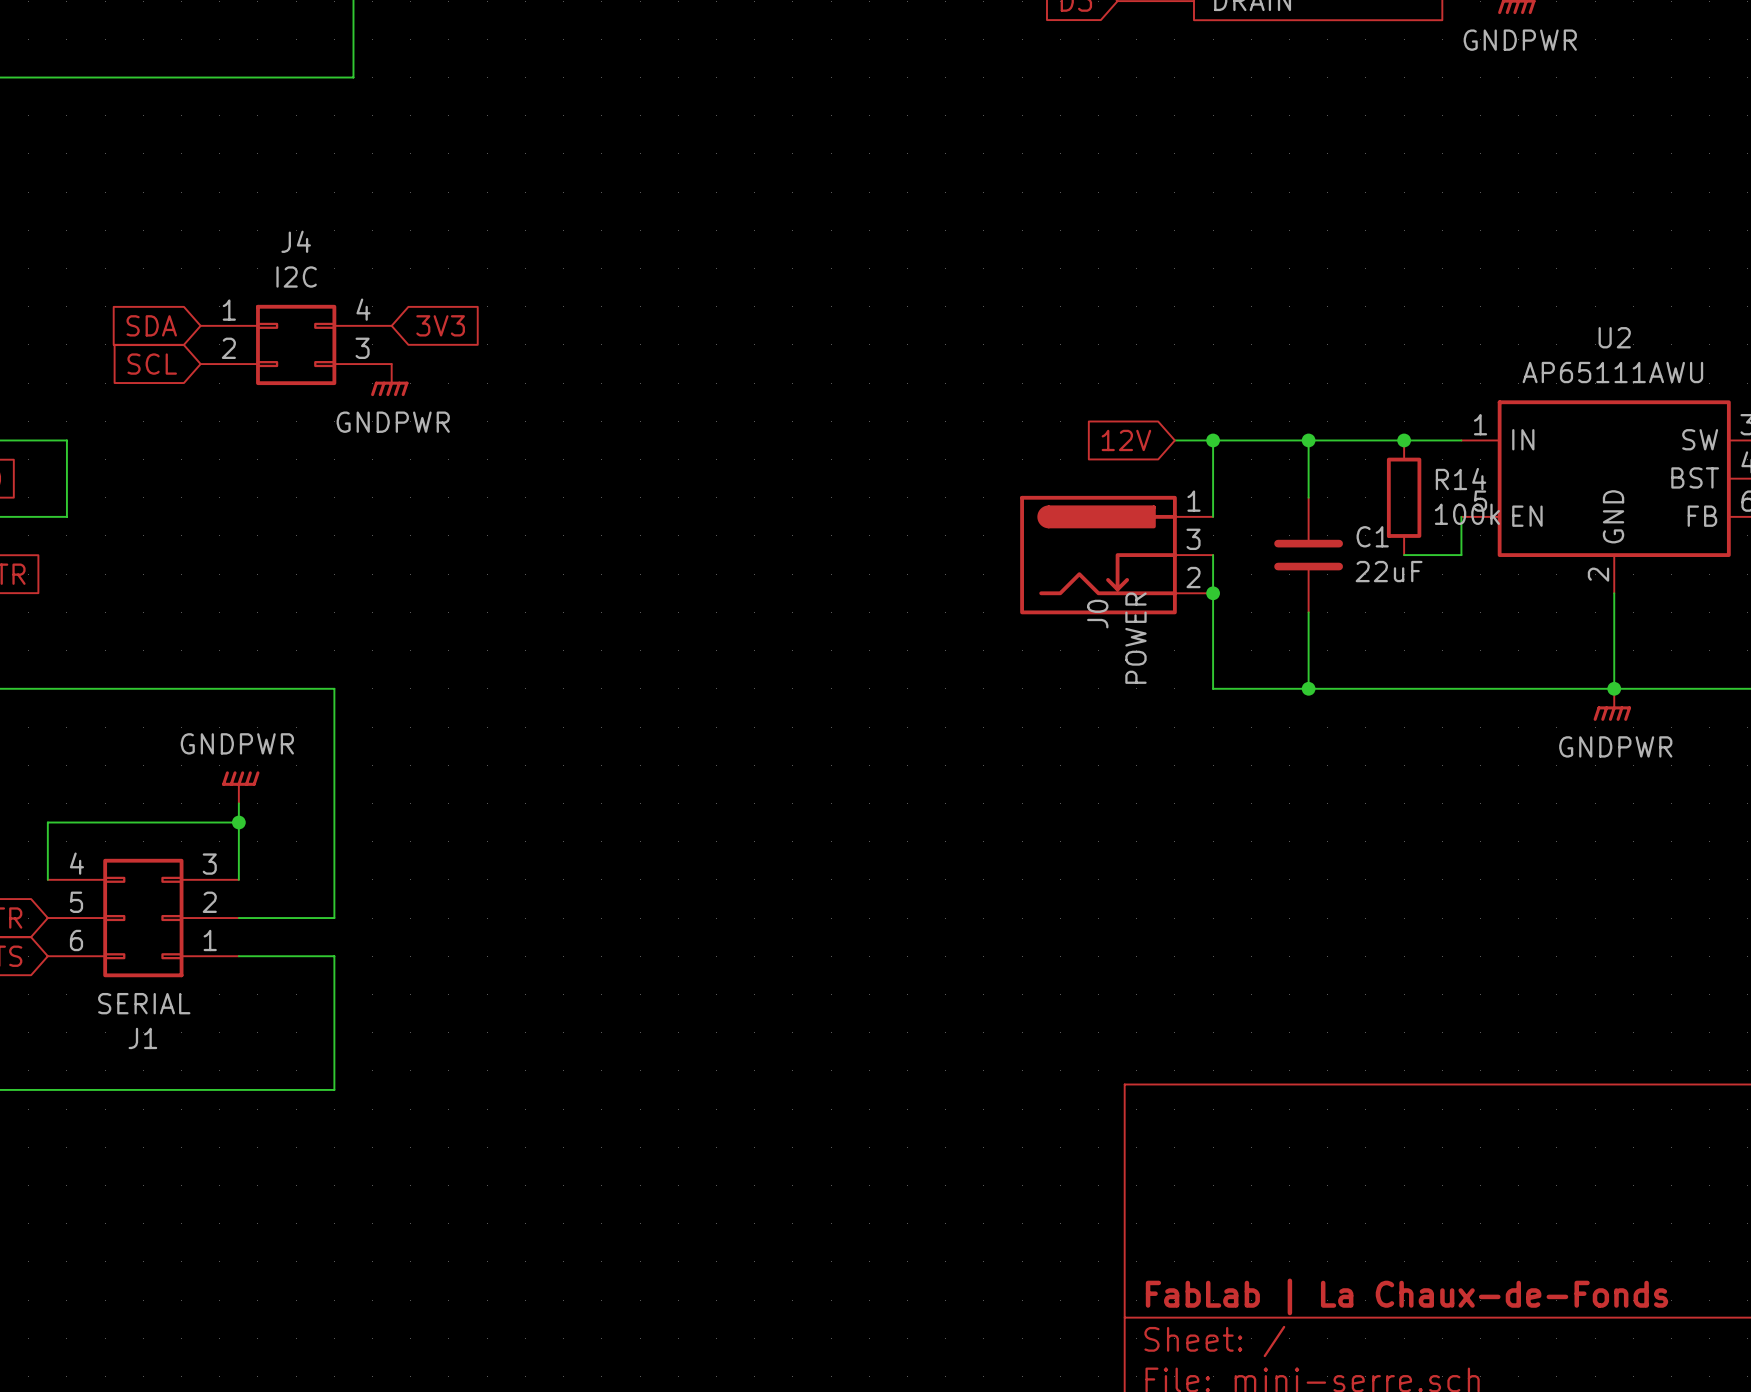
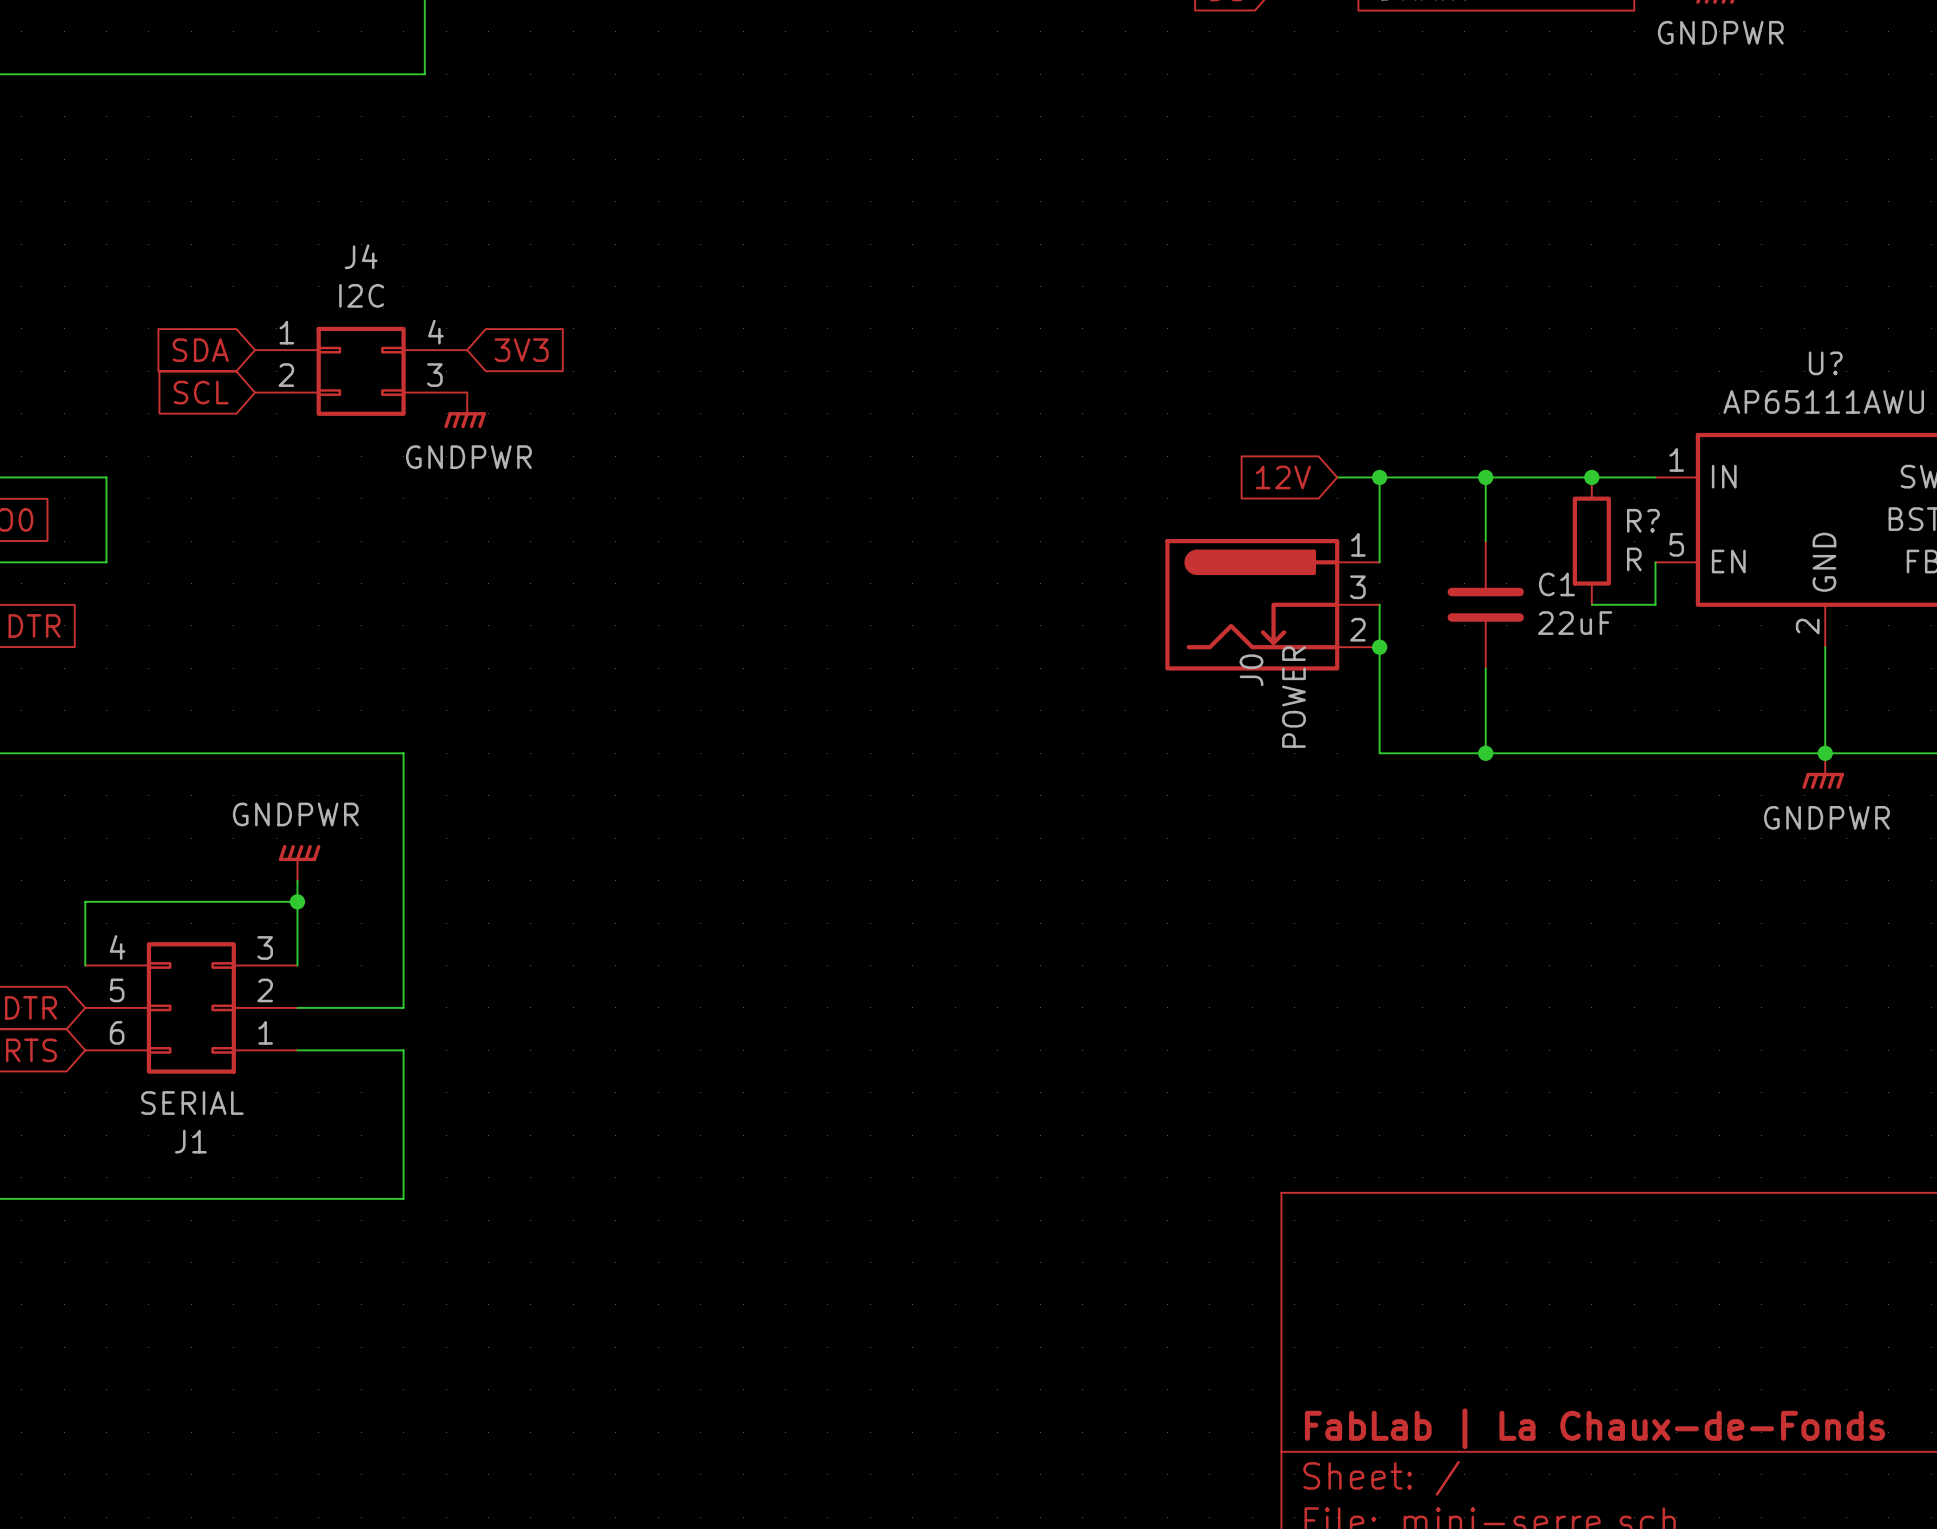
U2 name: U2 (1614, 337) -> U? (1825, 363)
R14 name: R14 (1461, 479) -> R? (1643, 520)
R14 value: 100k (1467, 514) -> R (1634, 559)

